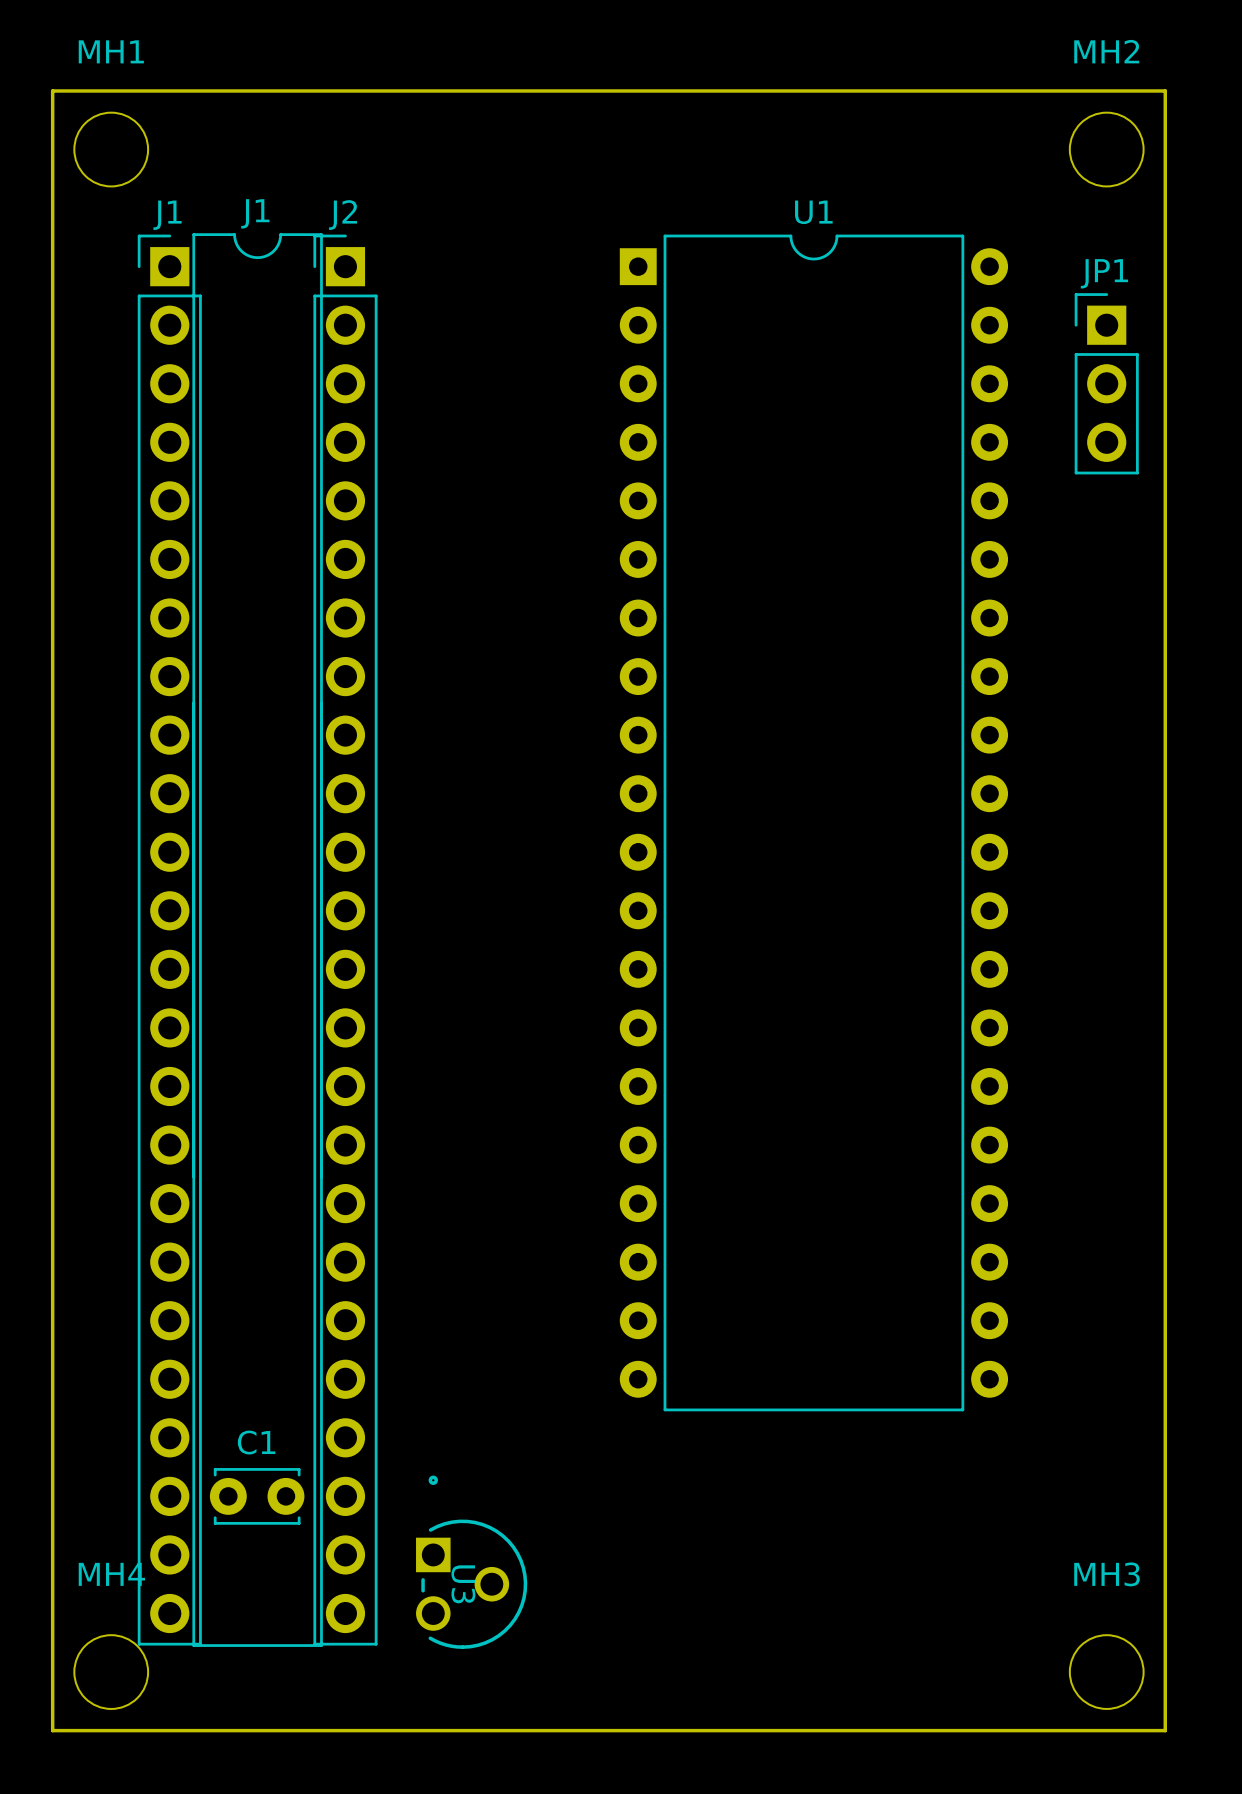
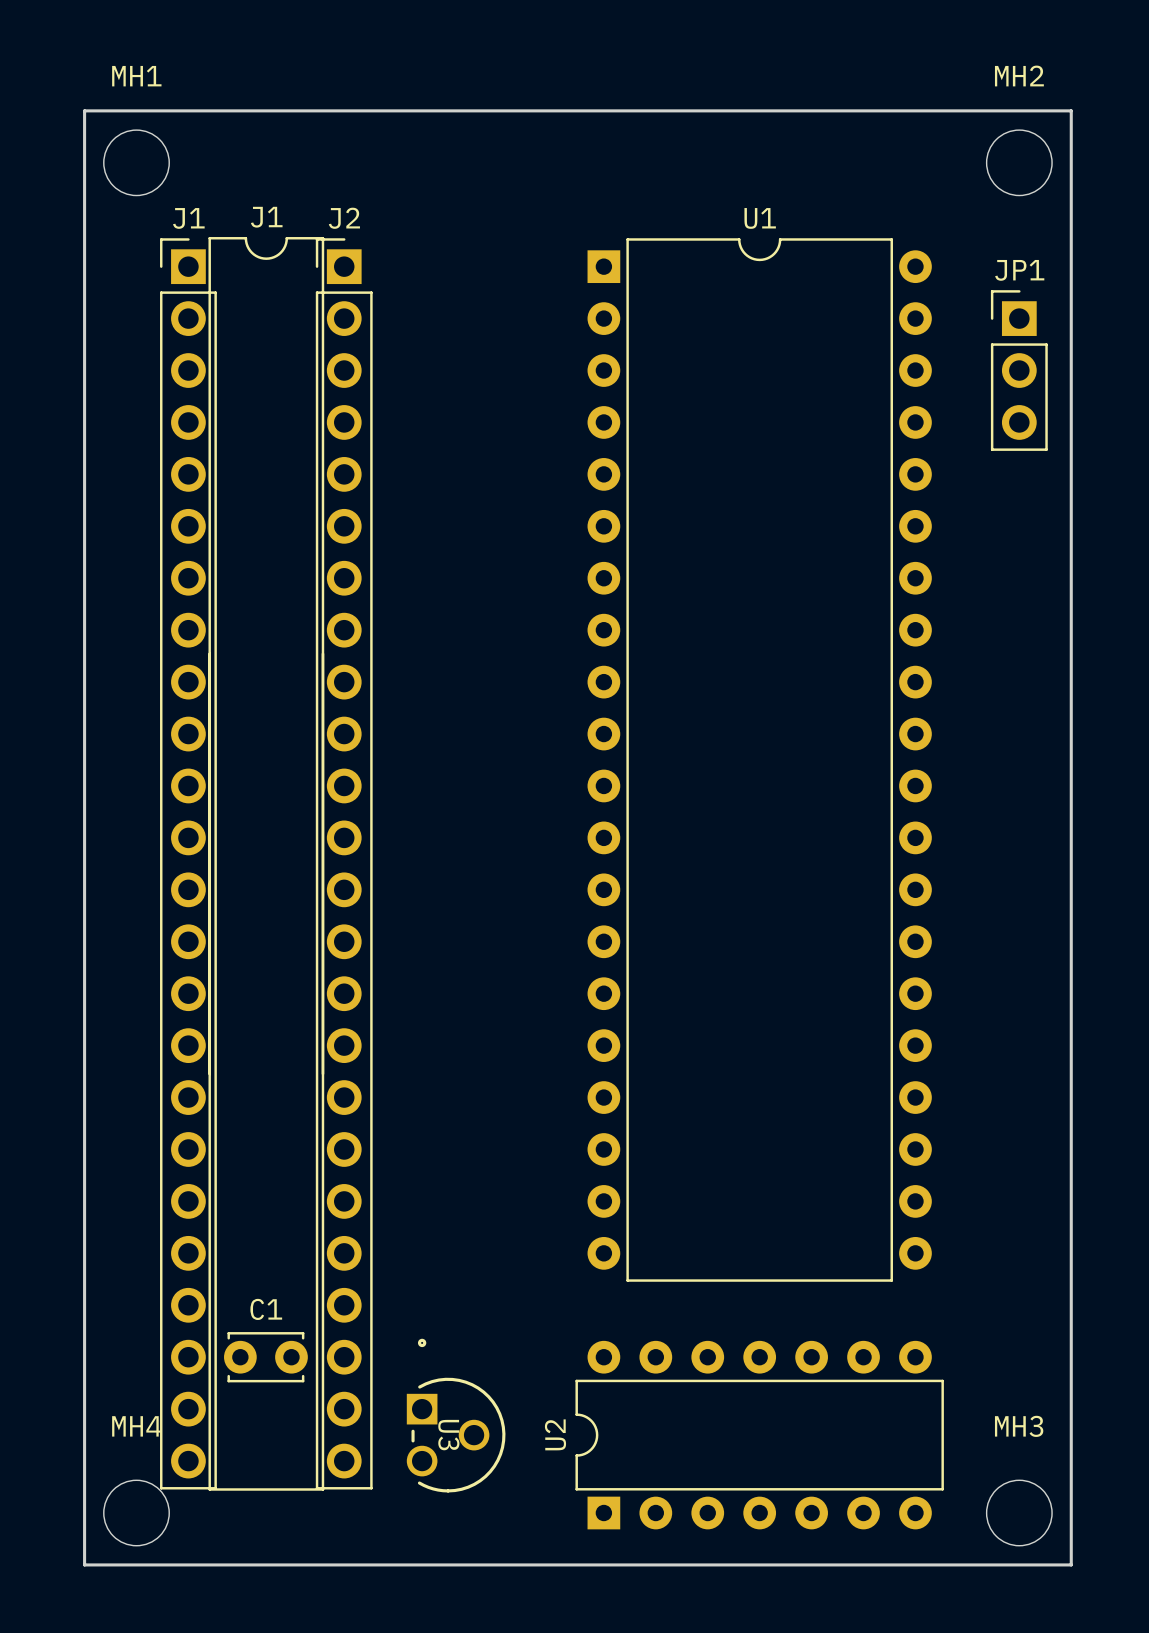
U2: none -> (759, 1435)

